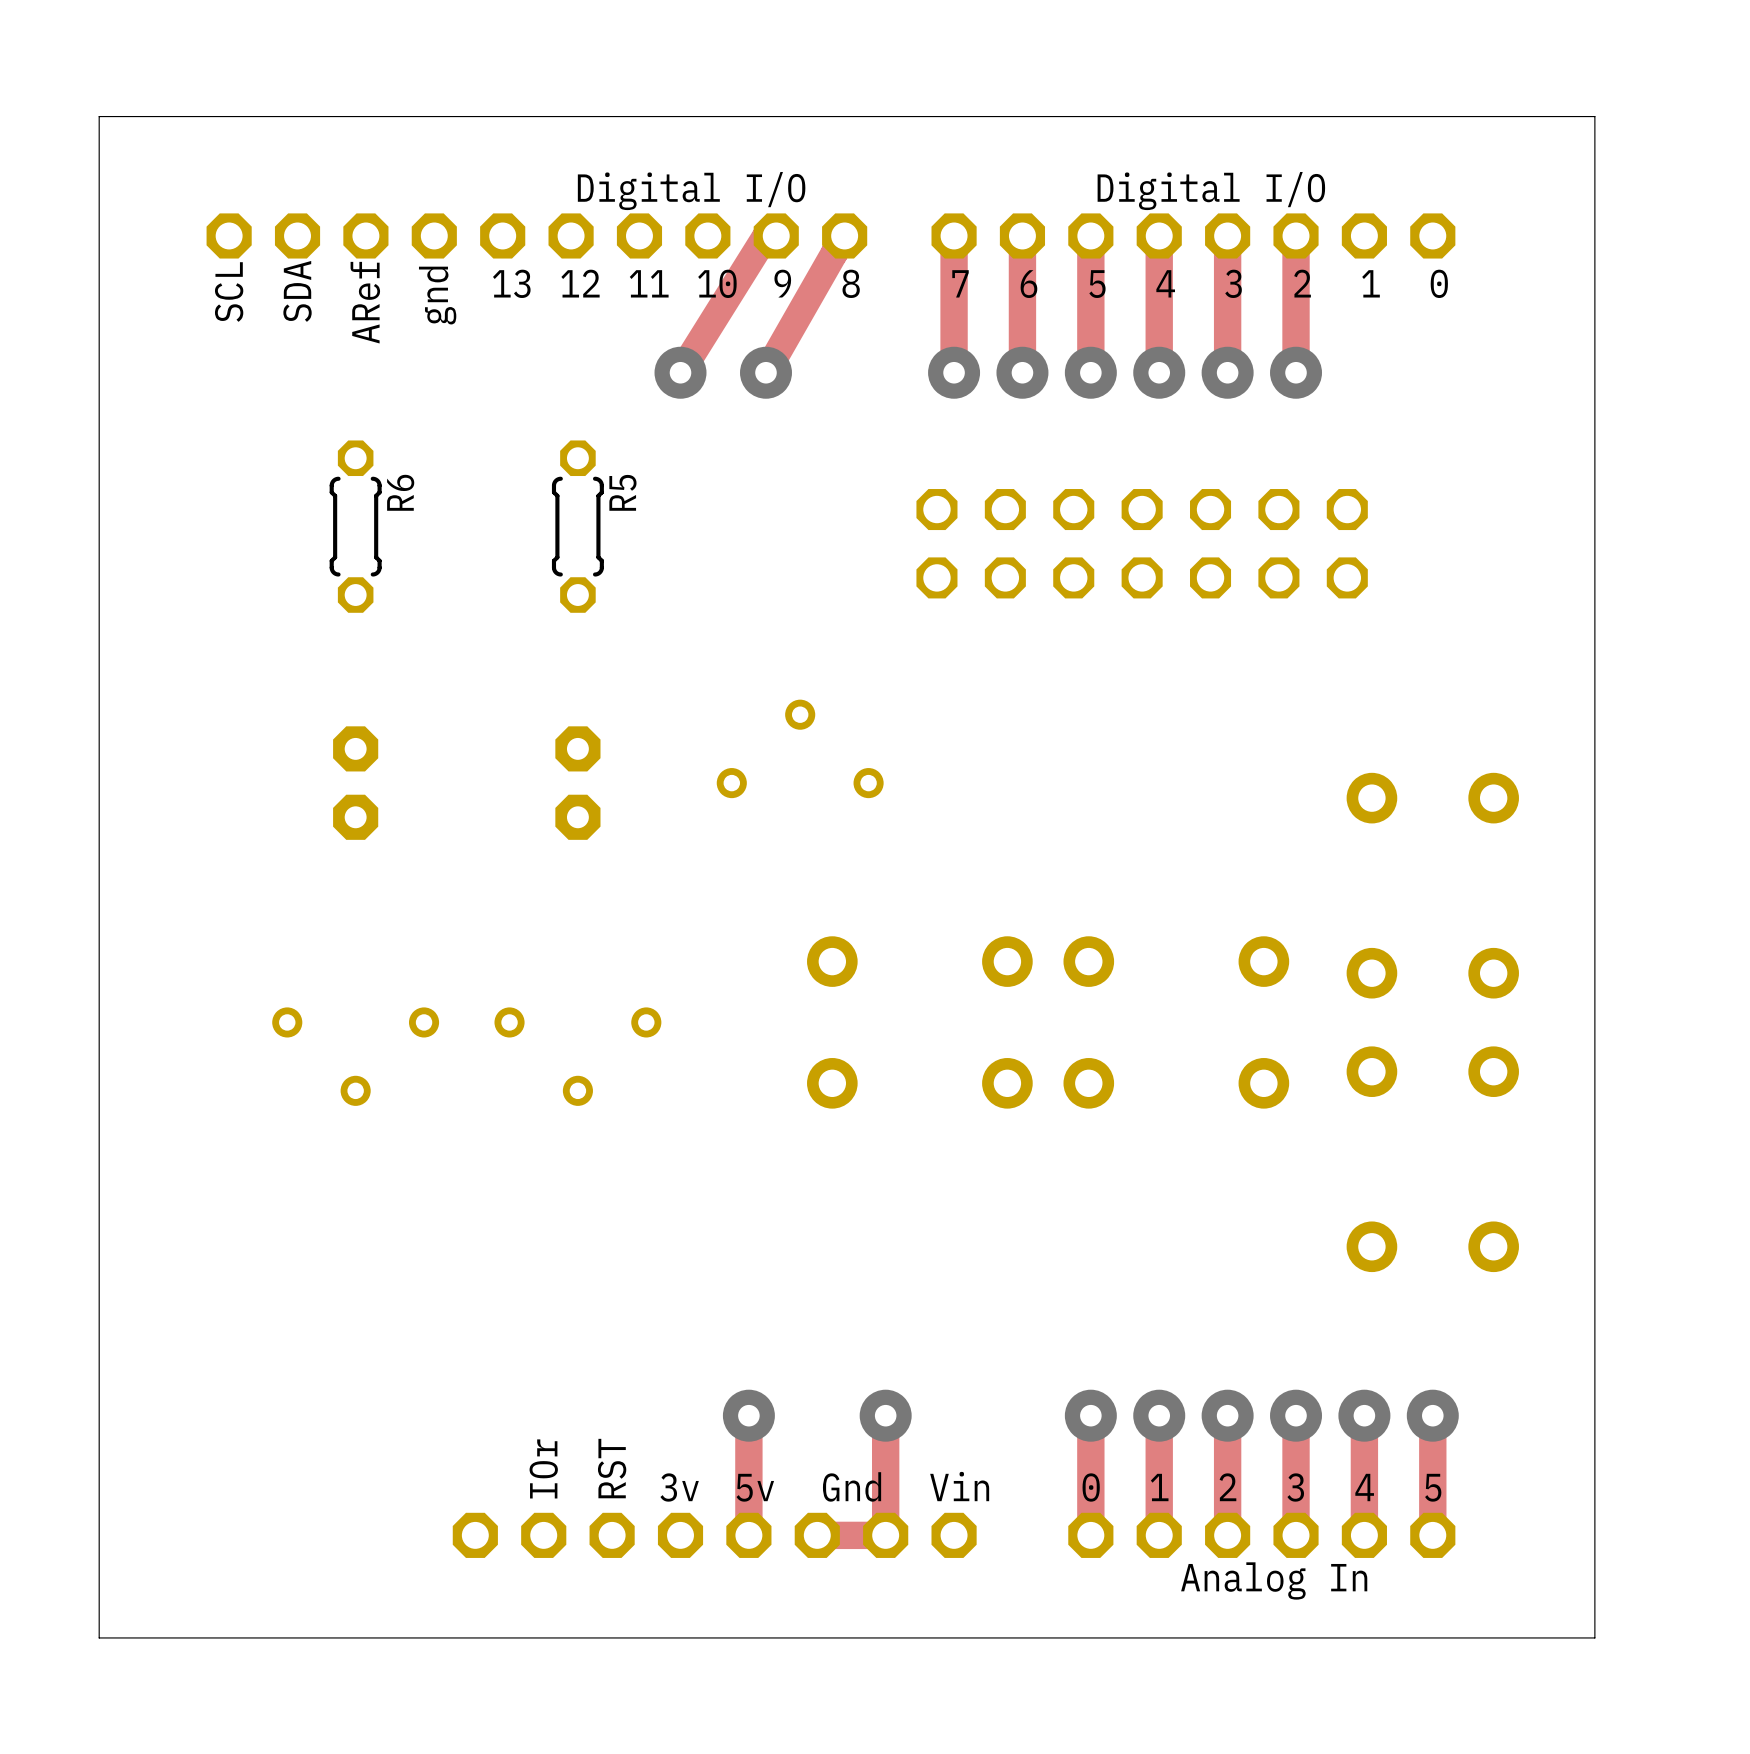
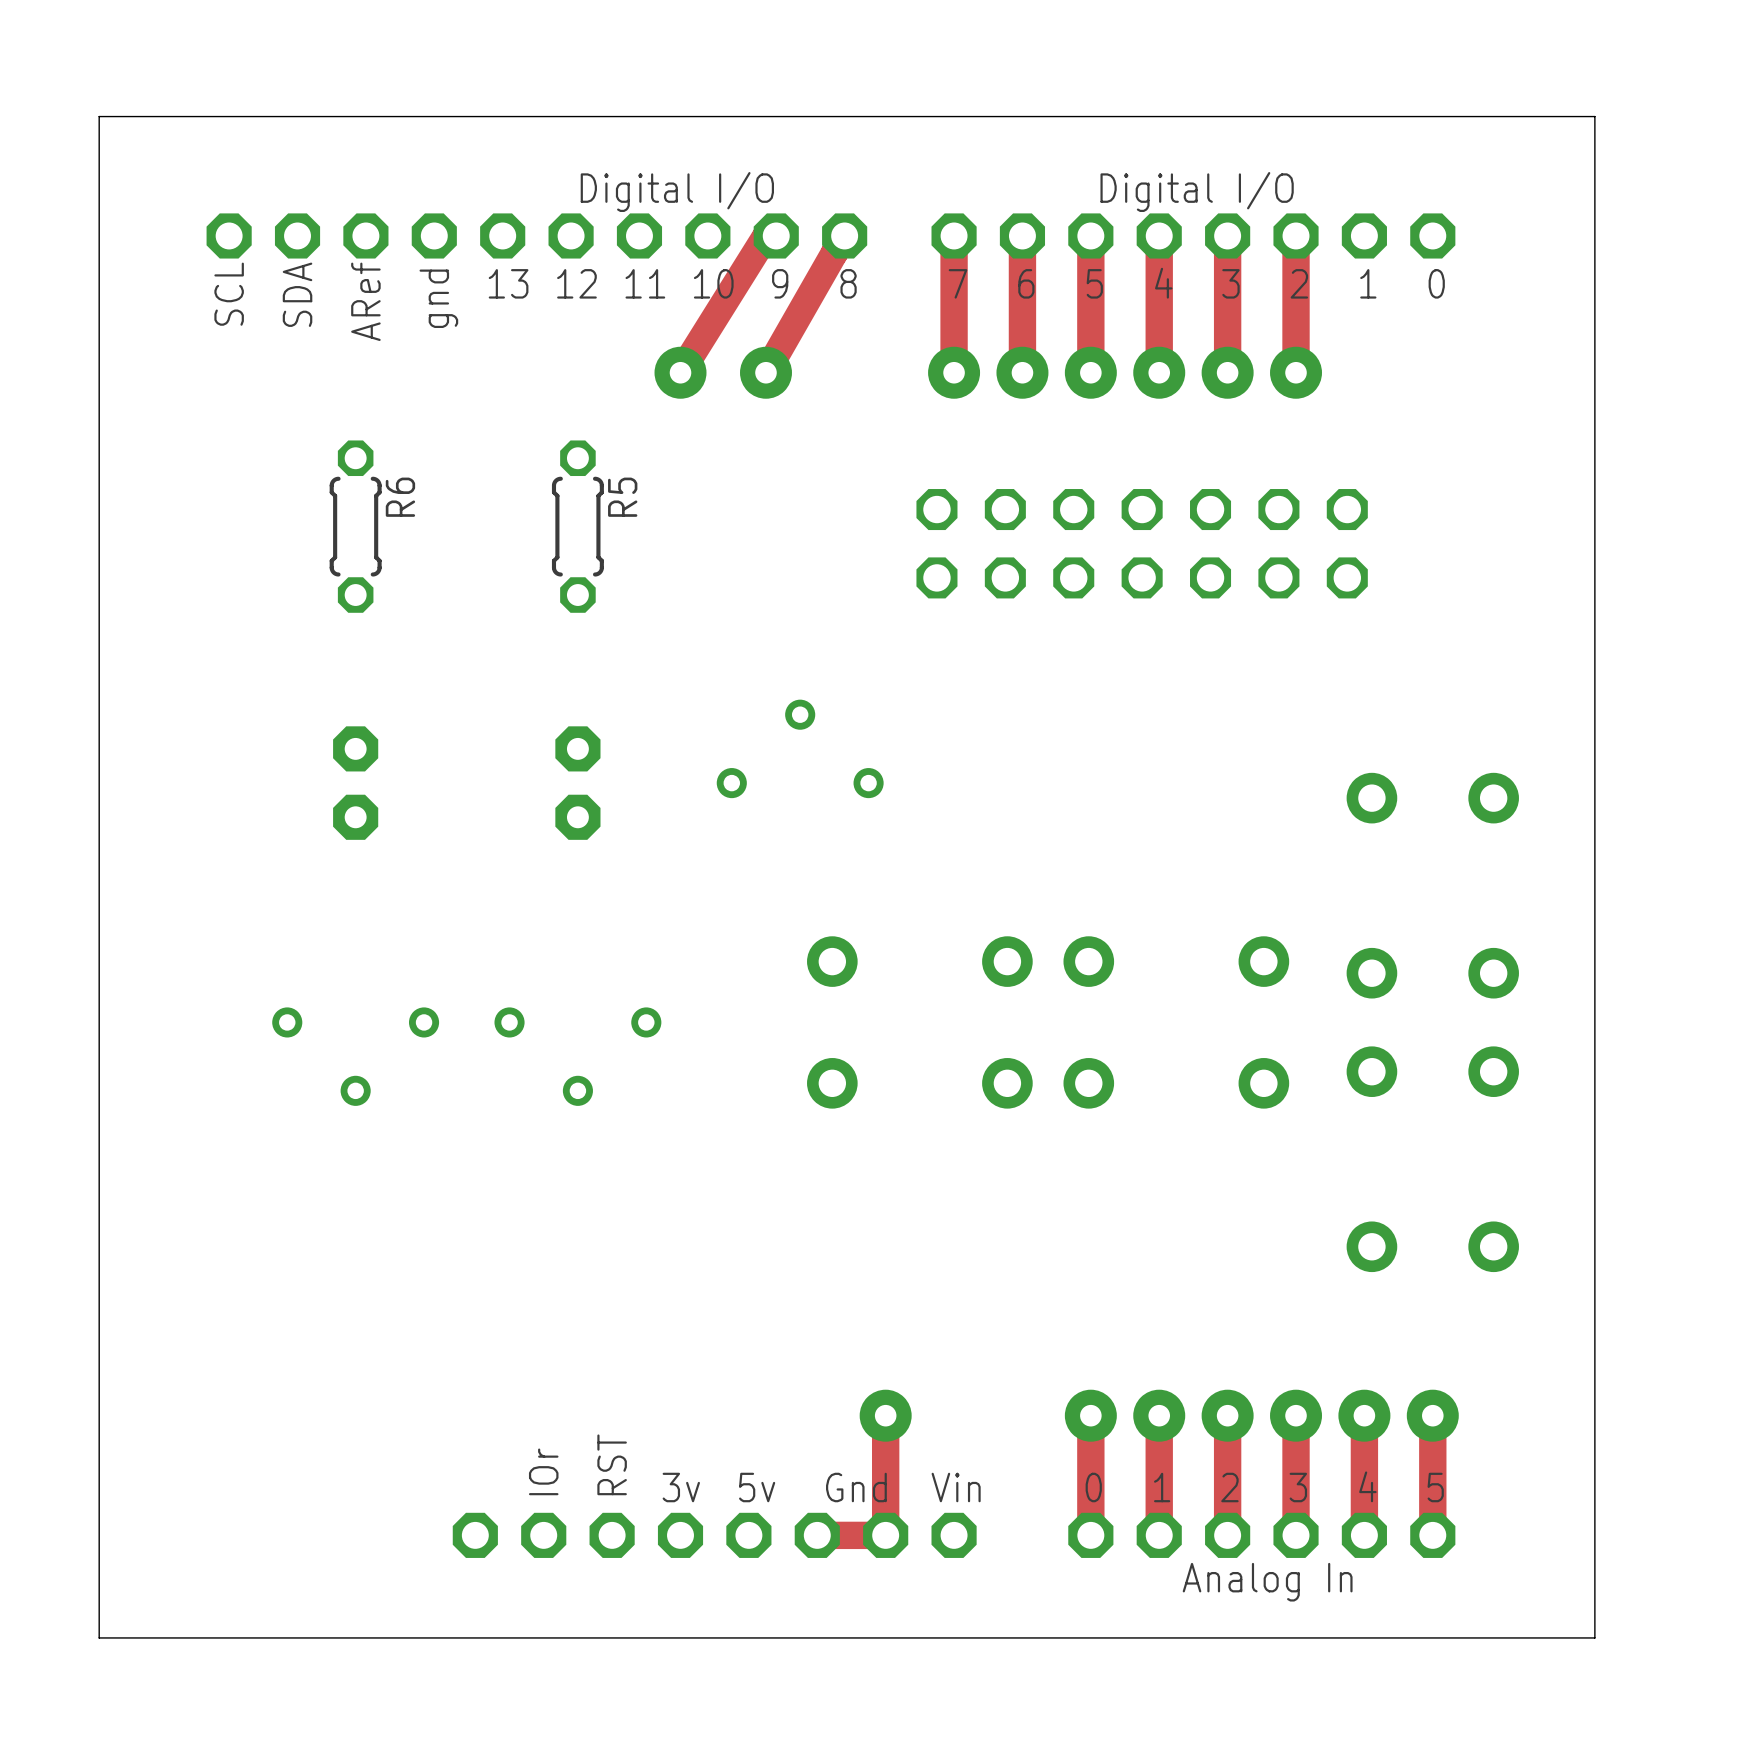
track: (748, 1415) (748, 1535) -> none
via: (748, 1415) -> none

